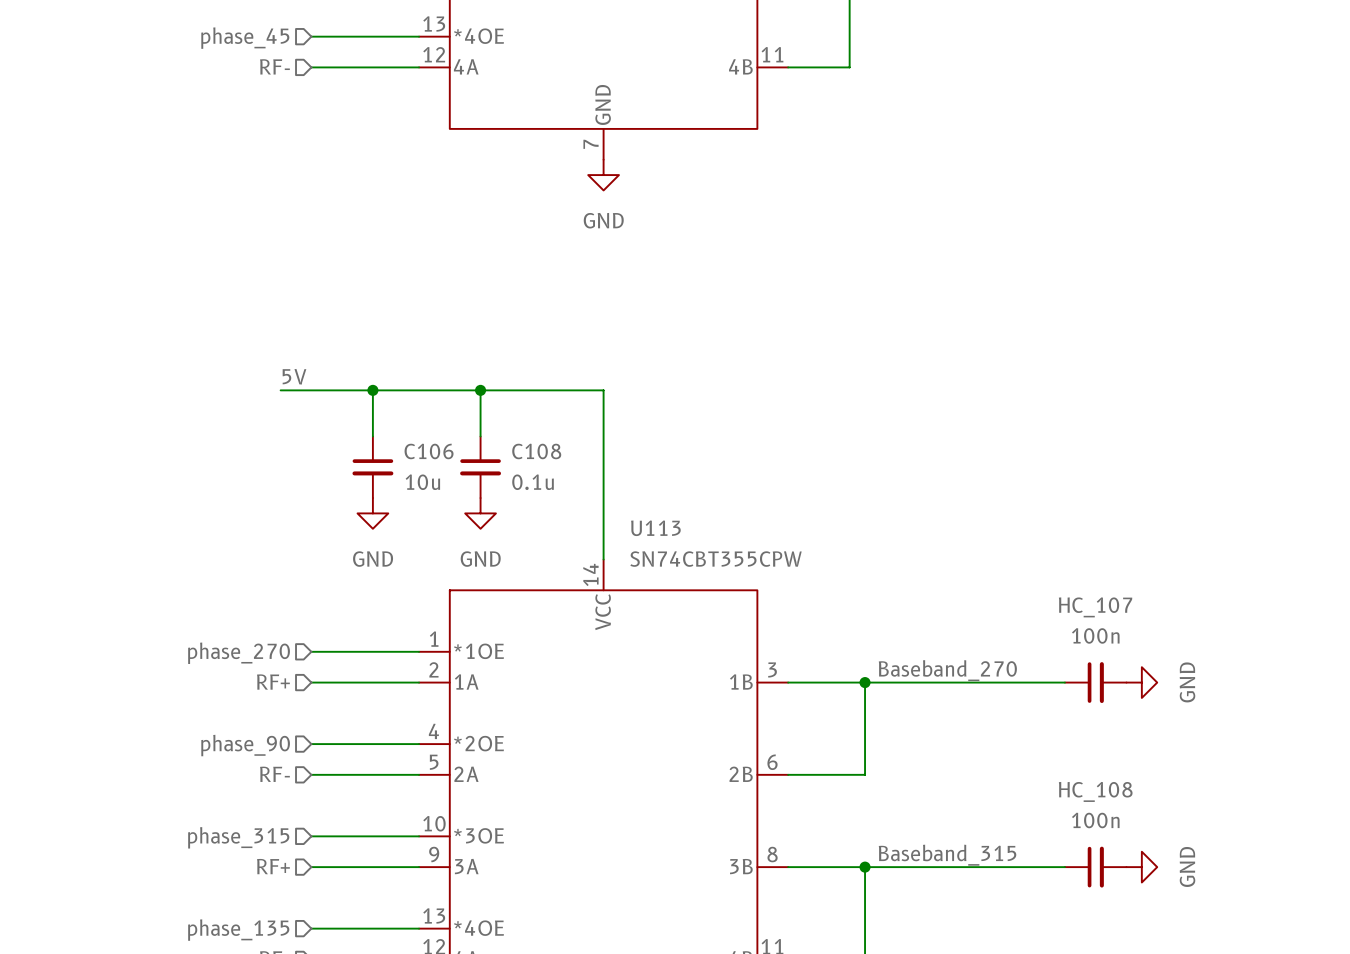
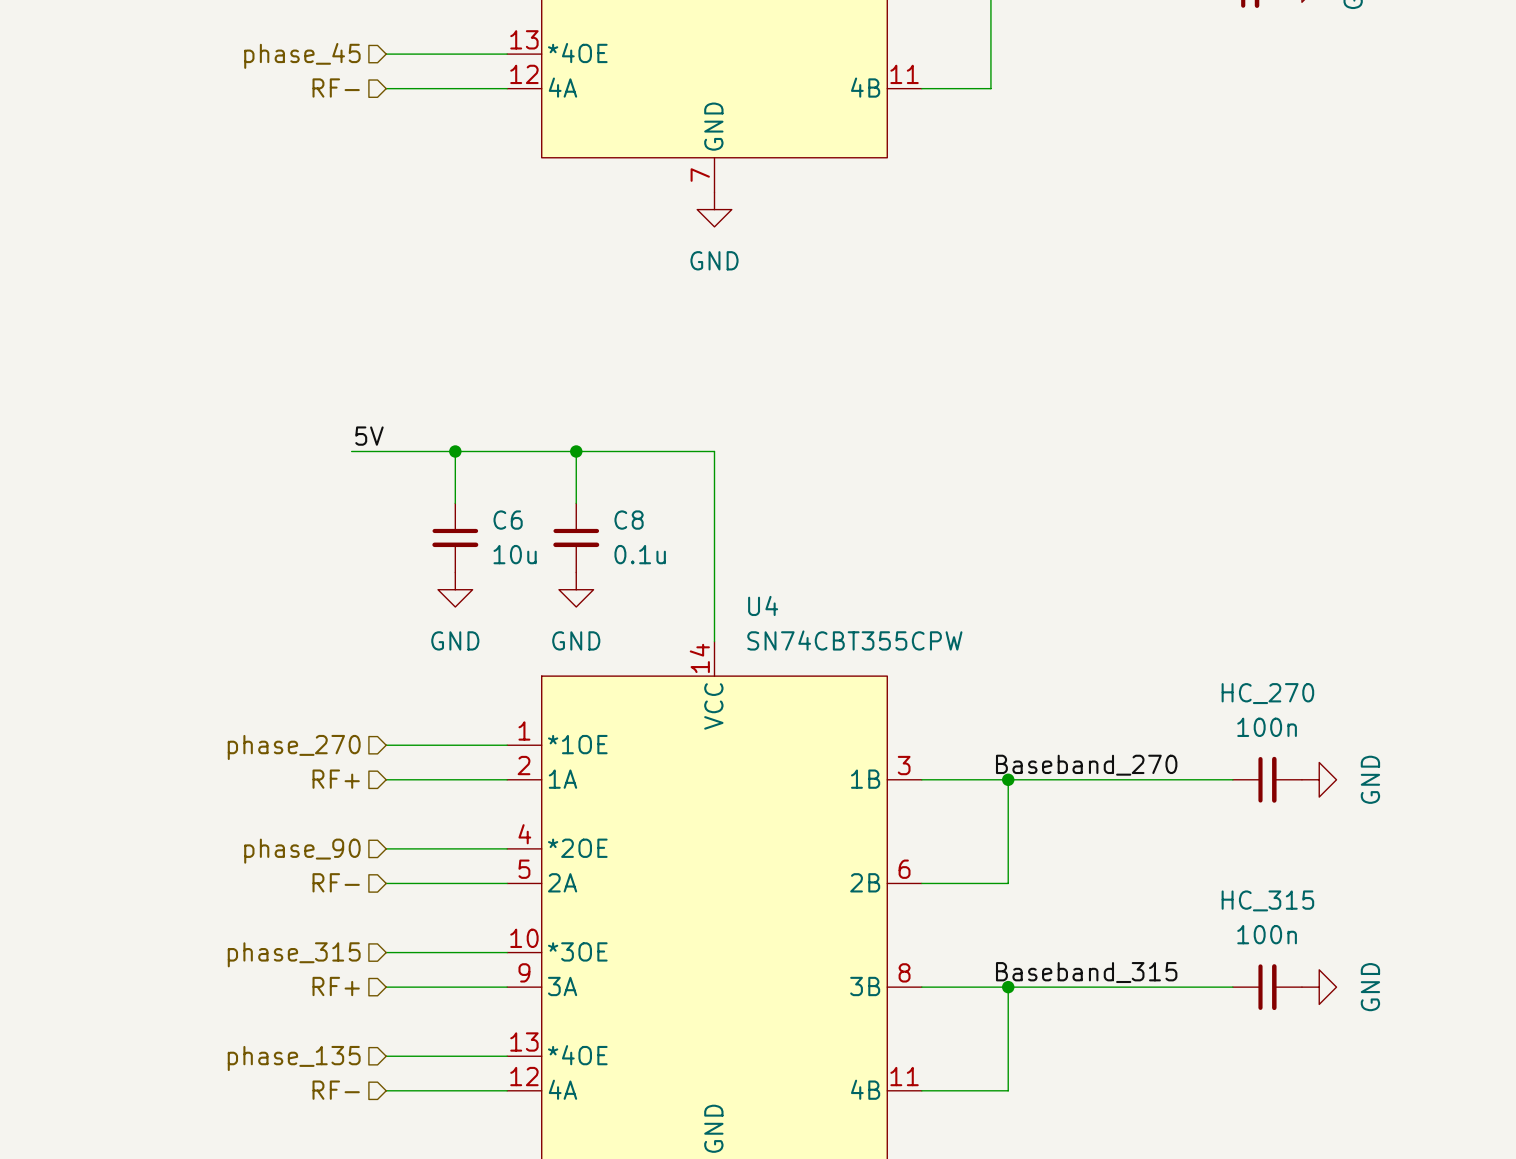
C106 name: C106 (429, 451) -> C6 (508, 520)
C108 name: C108 (536, 451) -> C8 (629, 520)
U113 name: U113 (655, 528) -> U4 (763, 605)
HC_107 name: HC_107 (1095, 607) -> HC_270 (1267, 693)
HC_108 name: HC_108 (1095, 791) -> HC_315 (1267, 900)

